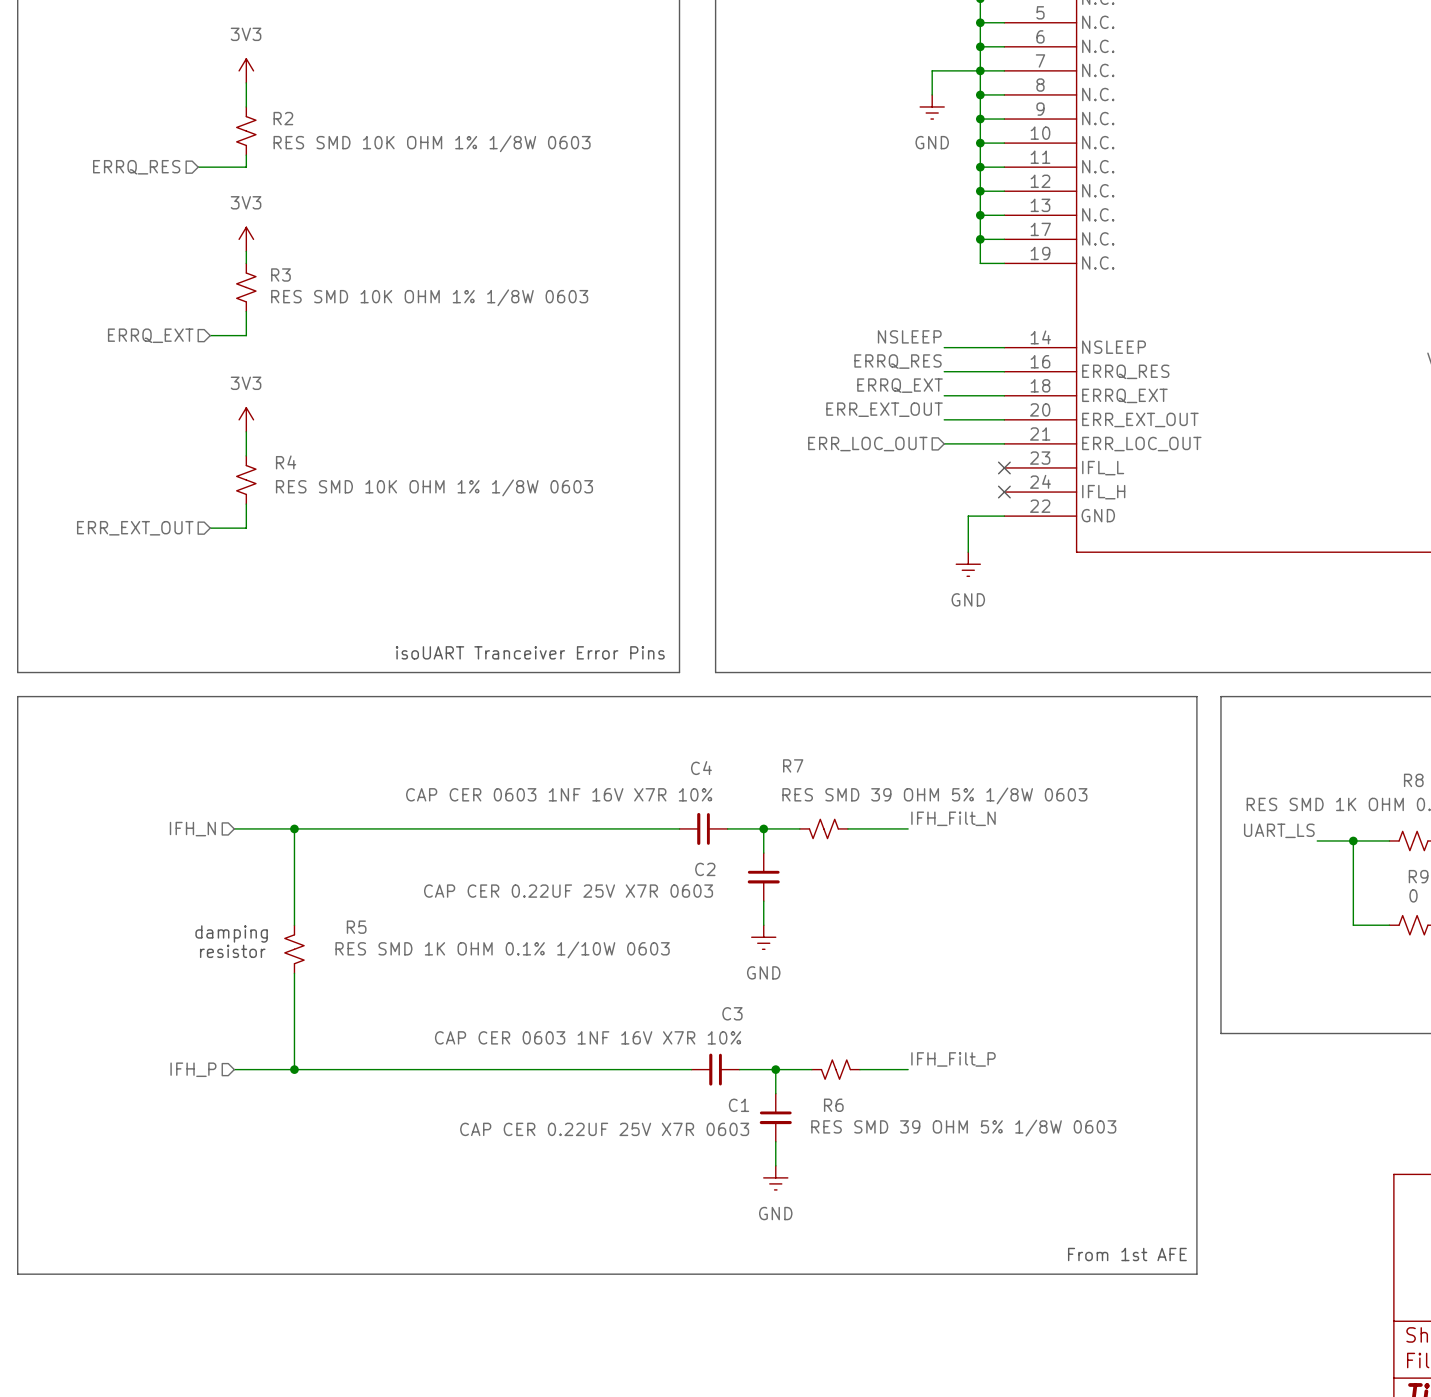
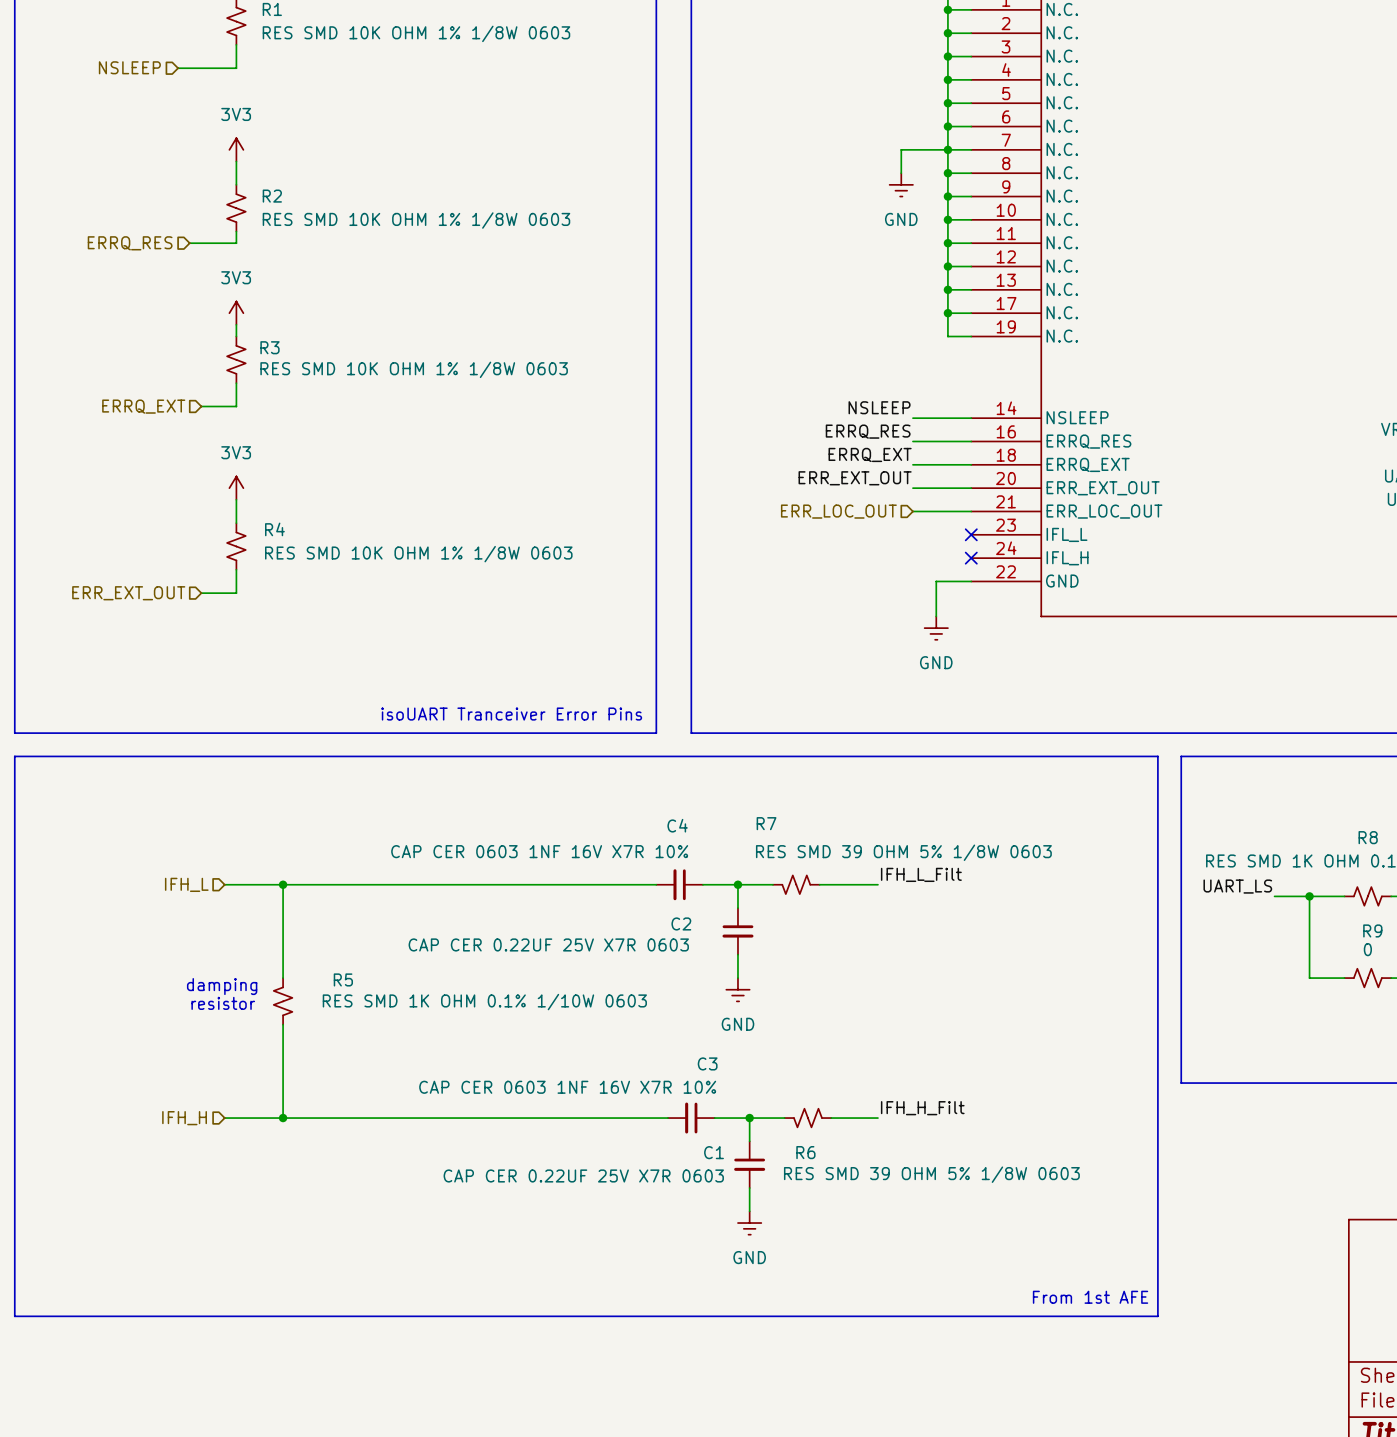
label: IFH_Filt_N (953, 818) -> IFH_L_Filt (921, 874)
hierarchical label: IFH_N (192, 829) -> IFH_L (186, 884)
label: IFH_Filt_P (953, 1059) -> IFH_H_Filt (922, 1108)
hierarchical label: IFH_P (193, 1069) -> IFH_H (184, 1118)

